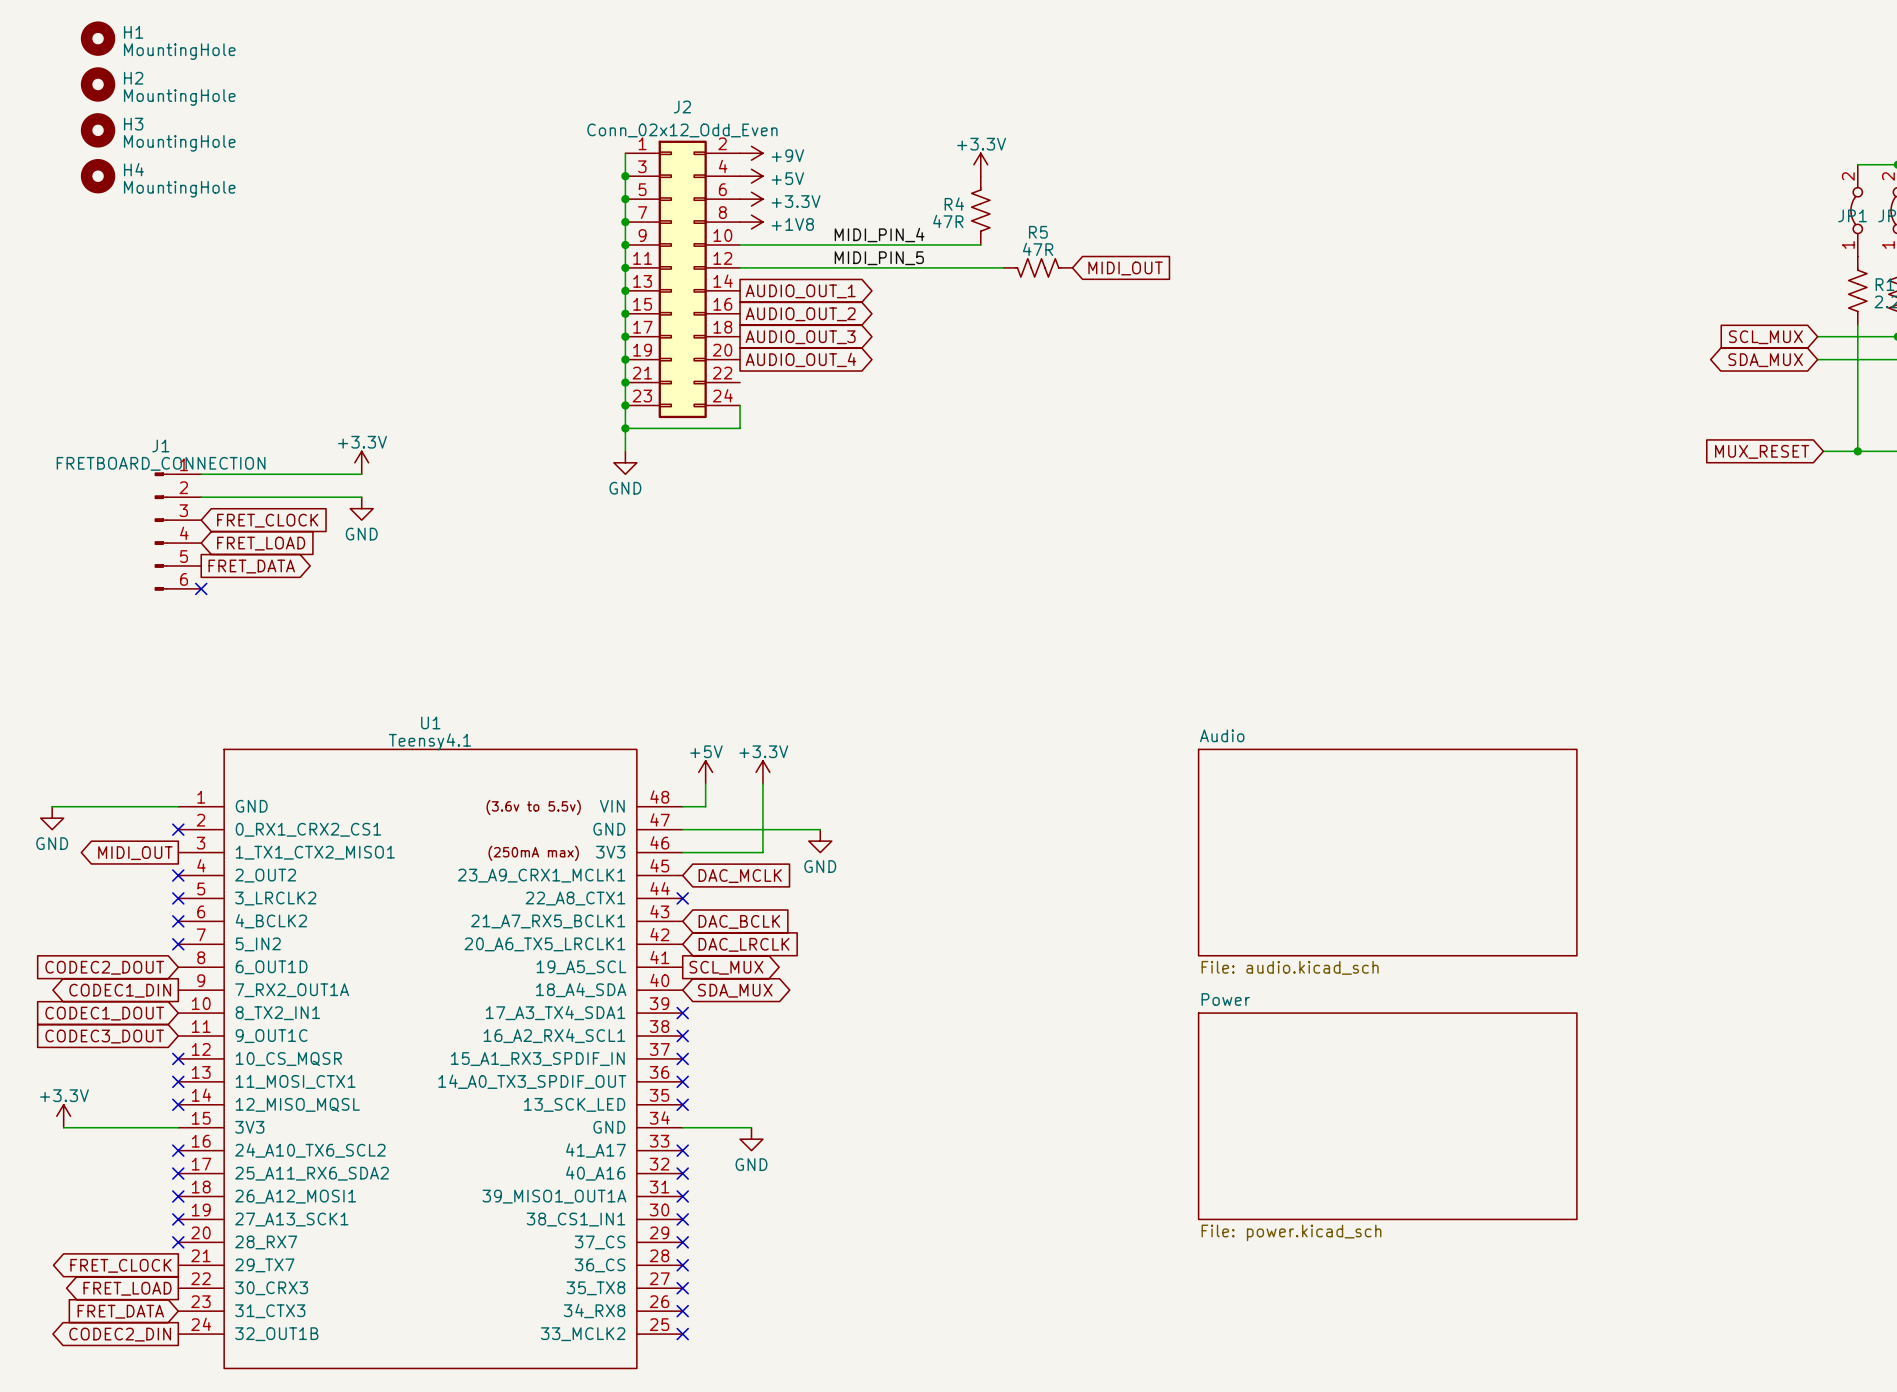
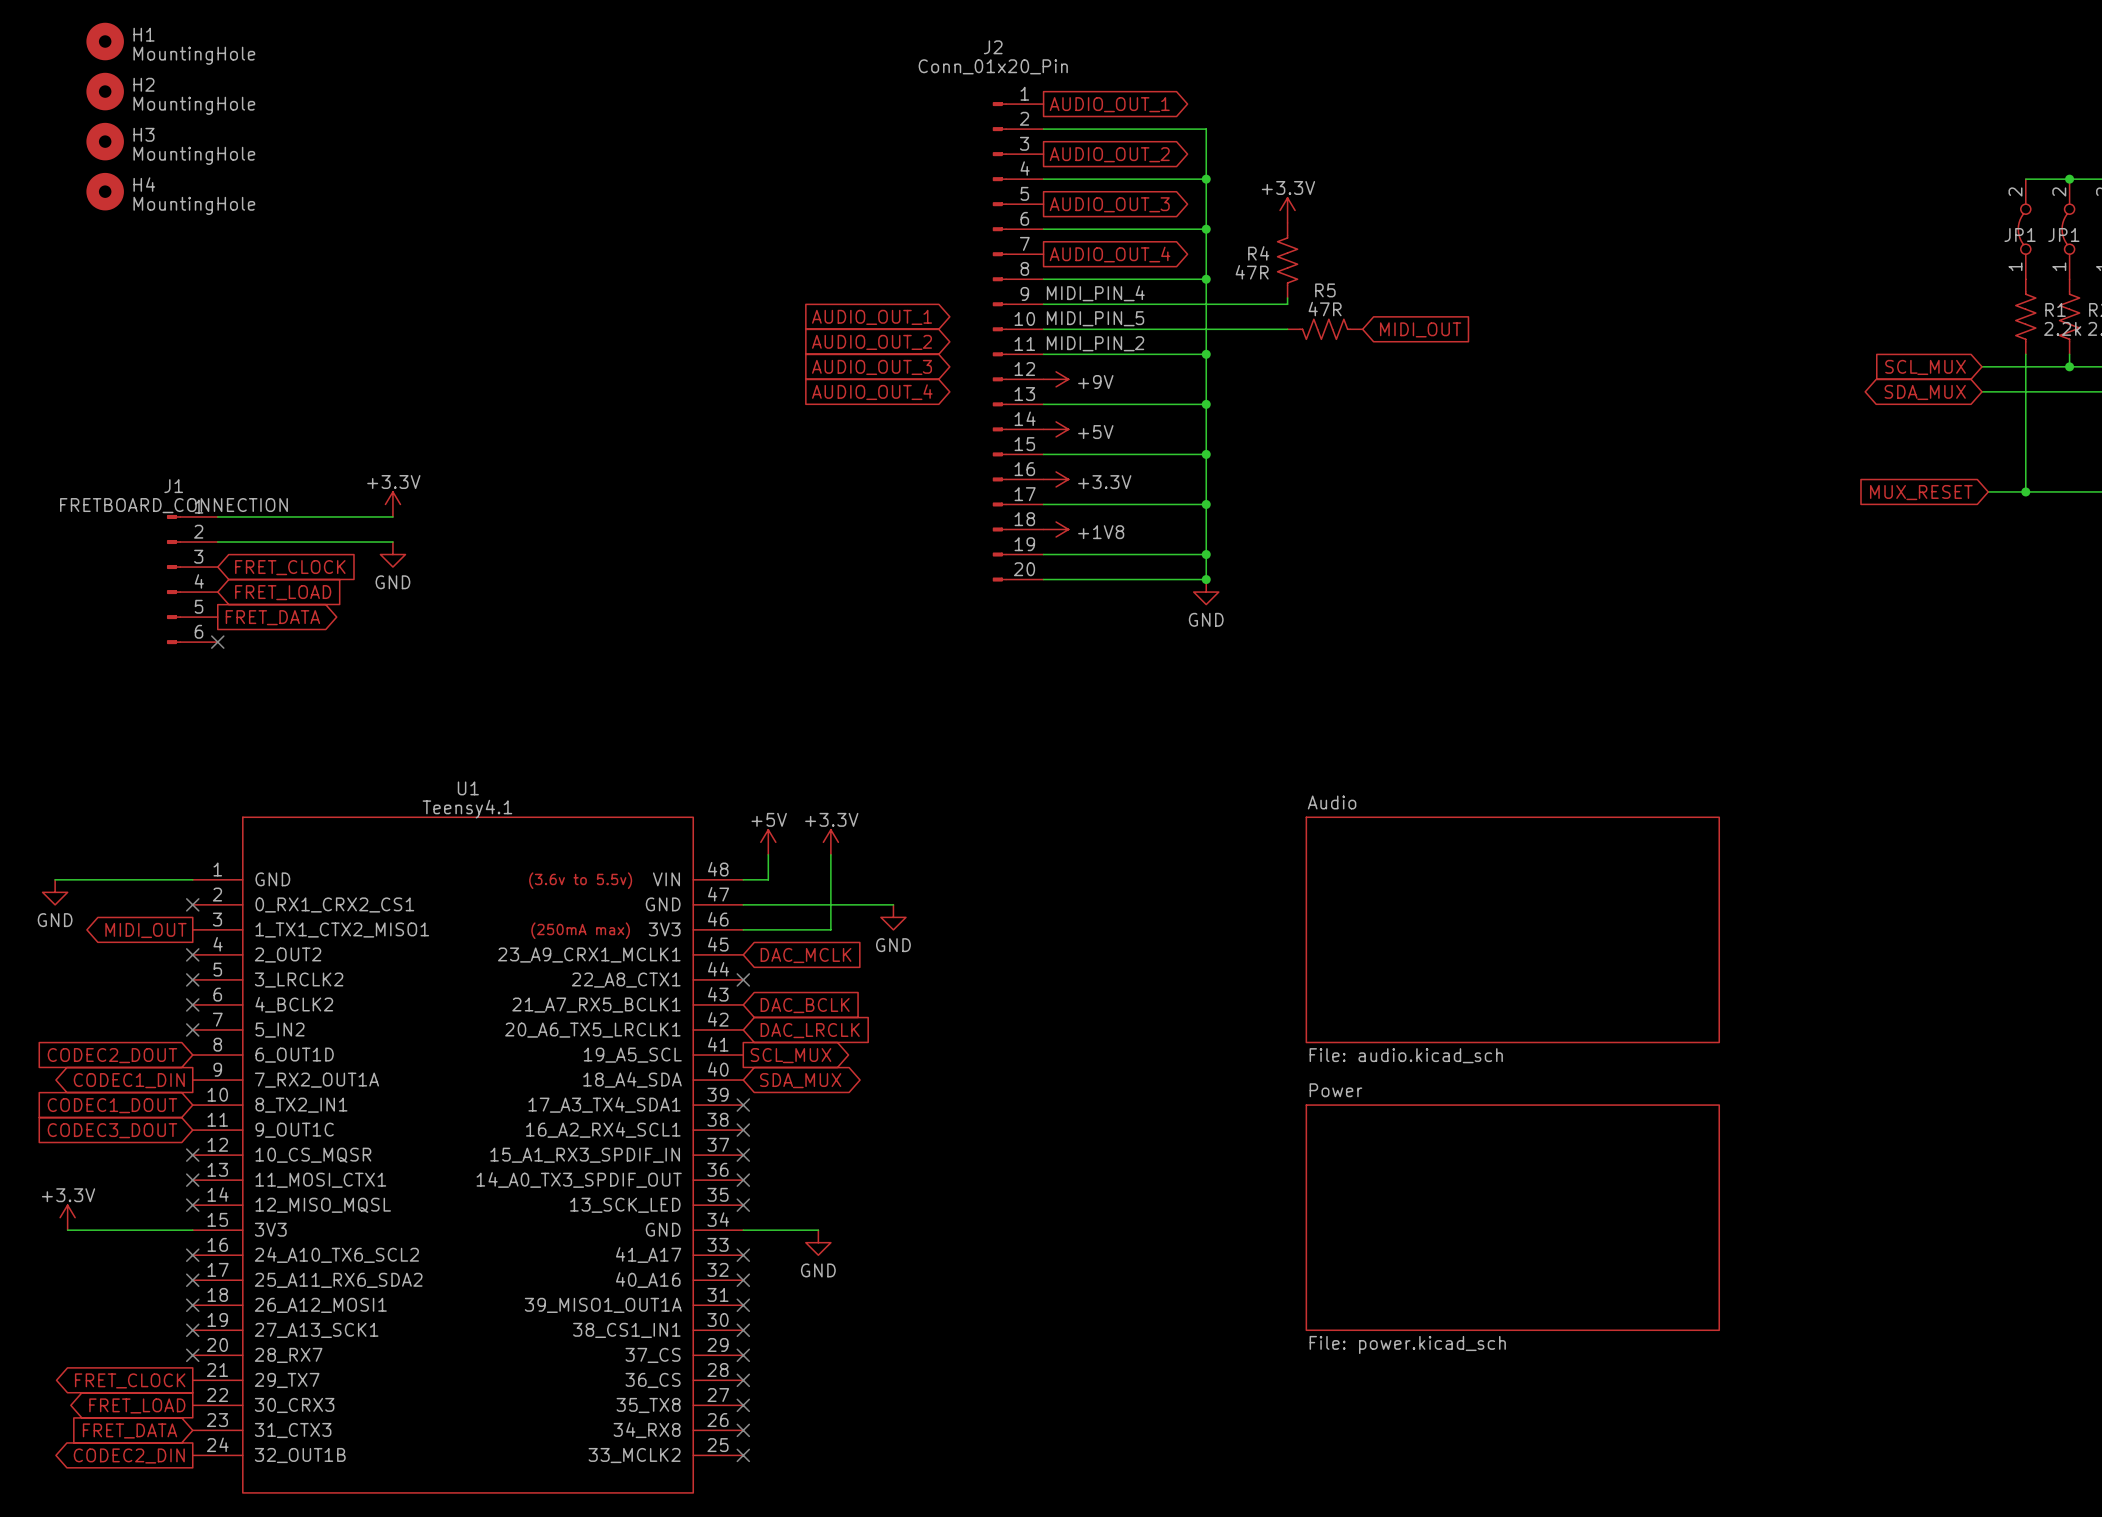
global label: none -> AUDIO_OUT_1 (1109, 104)
J2 name position: J2 (682, 106) -> J2 (993, 47)
wire: none -> (1043, 129) (1206, 129) (1206, 579) (1043, 579)
J2 value: Conn_02x12_Odd_Even (682, 130) -> Conn_01x20_Pin (993, 66)
J2 symbol: [625, 140, 741, 419] -> [992, 102, 1044, 582]
global label: none -> AUDIO_OUT_2 (1109, 154)
wire: (625, 153) (625, 451) -> none
power symbol: +9V (751, 153) -> none
wire: none -> (1043, 179) (1206, 179)
power symbol: +3.3V (980, 164) -> none
junction: none -> (1206, 179)
junction: (625, 176) -> none
power symbol: +5V (751, 176) -> none
global label: none -> AUDIO_OUT_3 (1109, 204)
power symbol: none -> +3.3V (1287, 210)
junction: (625, 199) -> none
power symbol: +3.3V (751, 199) -> none
wire: none -> (1043, 229) (1206, 229)
R4 position: (980, 210) -> (1287, 260)
junction: none -> (1206, 229)
junction: (625, 222) -> none
power symbol: +1V8 (751, 222) -> none
global label: none -> AUDIO_OUT_4 (1110, 254)
label position: MIDI_PIN_4 (879, 235) -> MIDI_PIN_4 (1095, 293)
junction: (625, 244) -> none
wire: (740, 244) (980, 244) -> none
wire: none -> (1043, 279) (1206, 279)
junction: none -> (1206, 279)
label position: MIDI_PIN_5 (879, 258) -> MIDI_PIN_5 (1095, 318)
junction: (625, 267) -> none
wire: (740, 267) (1003, 267) -> none
R5 position: (1038, 267) -> (1325, 329)
global label position: MIDI_OUT (1125, 268) -> MIDI_OUT (1420, 329)
wire: none -> (1287, 298) (1287, 304) (1043, 304)
junction: (625, 290) -> none
wire: none -> (1043, 329) (1287, 329)
junction: (625, 313) -> none
label: none -> MIDI_PIN_2 (1095, 343)
wire: none -> (1043, 354) (1206, 354)
junction: none -> (1206, 354)
junction: (625, 336) -> none
power symbol: none -> +9V (1056, 379)
junction: (625, 359) -> none
wire: none -> (1043, 404) (1206, 404)
junction: none -> (1206, 404)
junction: (625, 382) -> none
power symbol: none -> +5V (1056, 429)
junction: (625, 405) -> none
wire: (740, 405) (740, 428) (625, 428) -> none
wire: none -> (1043, 454) (1206, 454)
junction: none -> (1206, 454)
junction: (625, 428) -> none
power symbol: none -> +3.3V (1056, 479)
power symbol: GND (625, 462) -> none
wire: none -> (1043, 504) (1206, 504)
junction: none -> (1206, 504)
power symbol: none -> +1V8 (1056, 529)
wire: none -> (1043, 554) (1206, 554)
junction: none -> (1206, 554)
junction: none -> (1206, 579)
power symbol: none -> GND (1206, 592)

